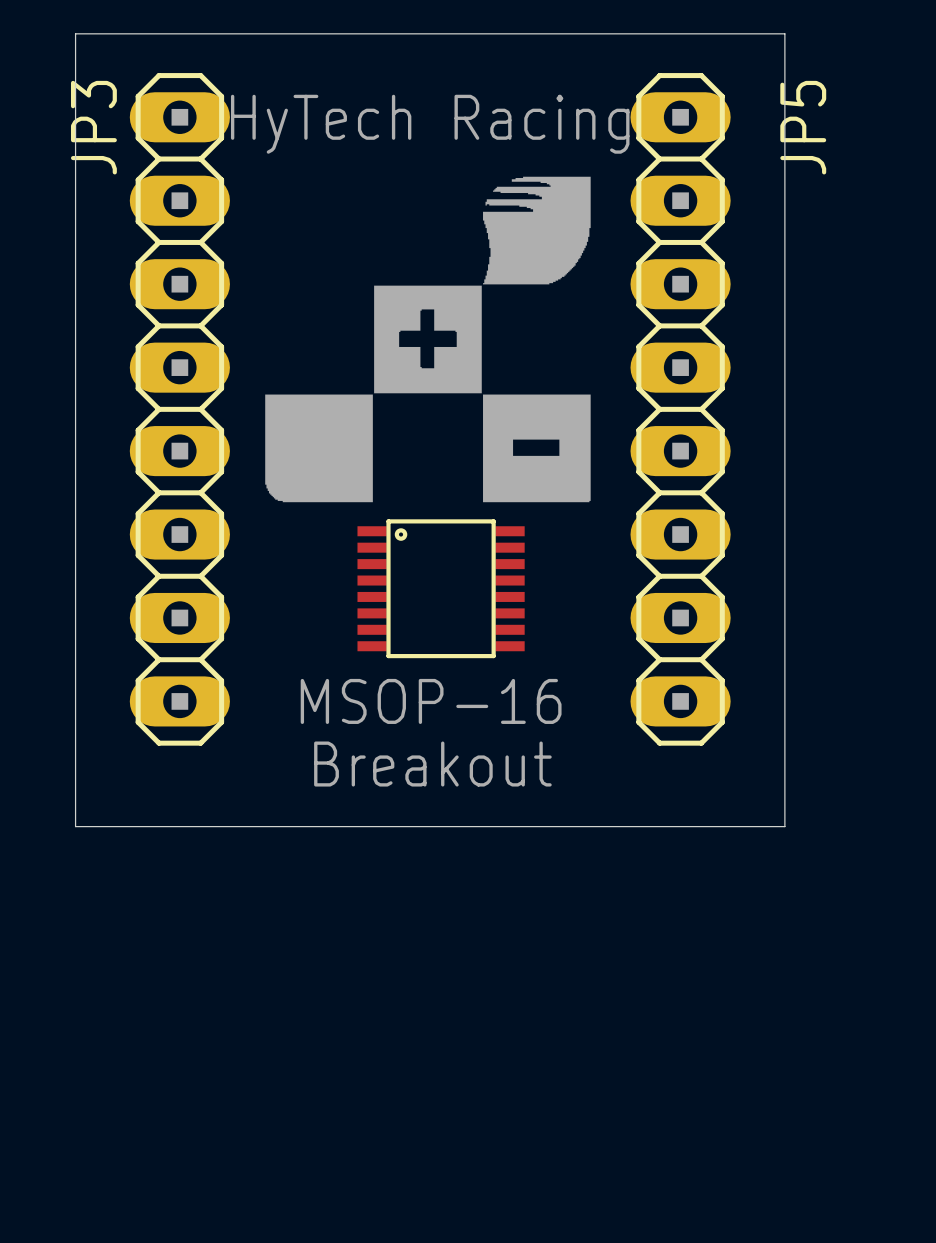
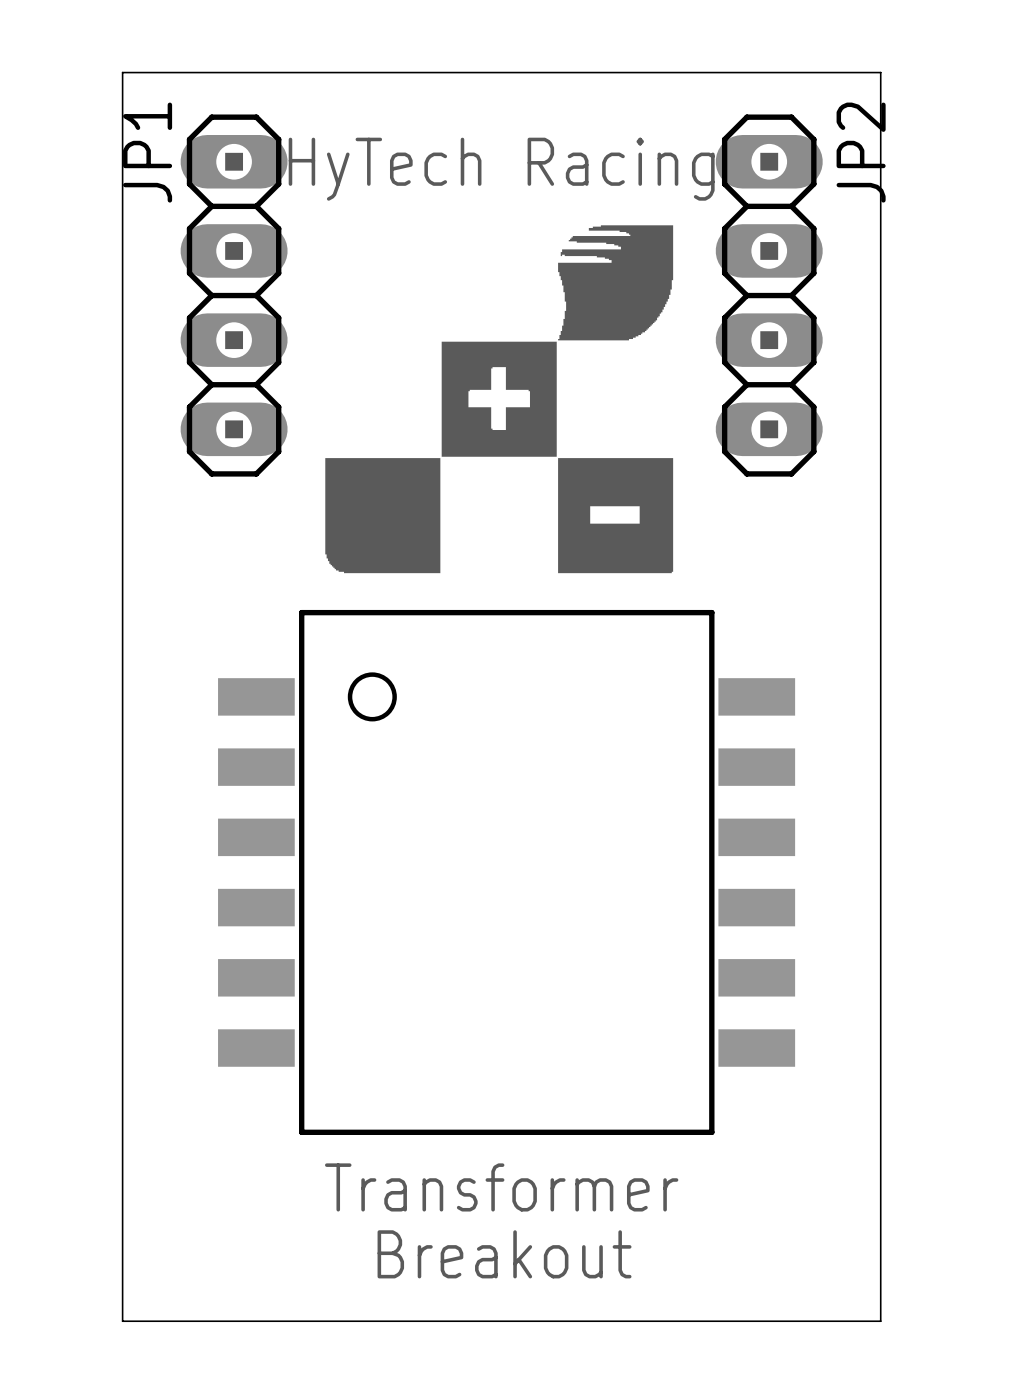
JP1: none -> (234, 295)
JP2: none -> (769, 295)
JP3: (179, 409) -> none
JP5: (680, 409) -> none
part: (441, 588) -> none
text: MSOP-16 (431, 701) -> none
text position: Breakout (432, 764) -> Breakout (504, 1254)
part: none -> (506, 872)
board edge: (75, 826) (784, 826) -> (122, 919) (122, 1321) (880, 1321) (880, 919)
text: none -> Transformer (501, 1187)

